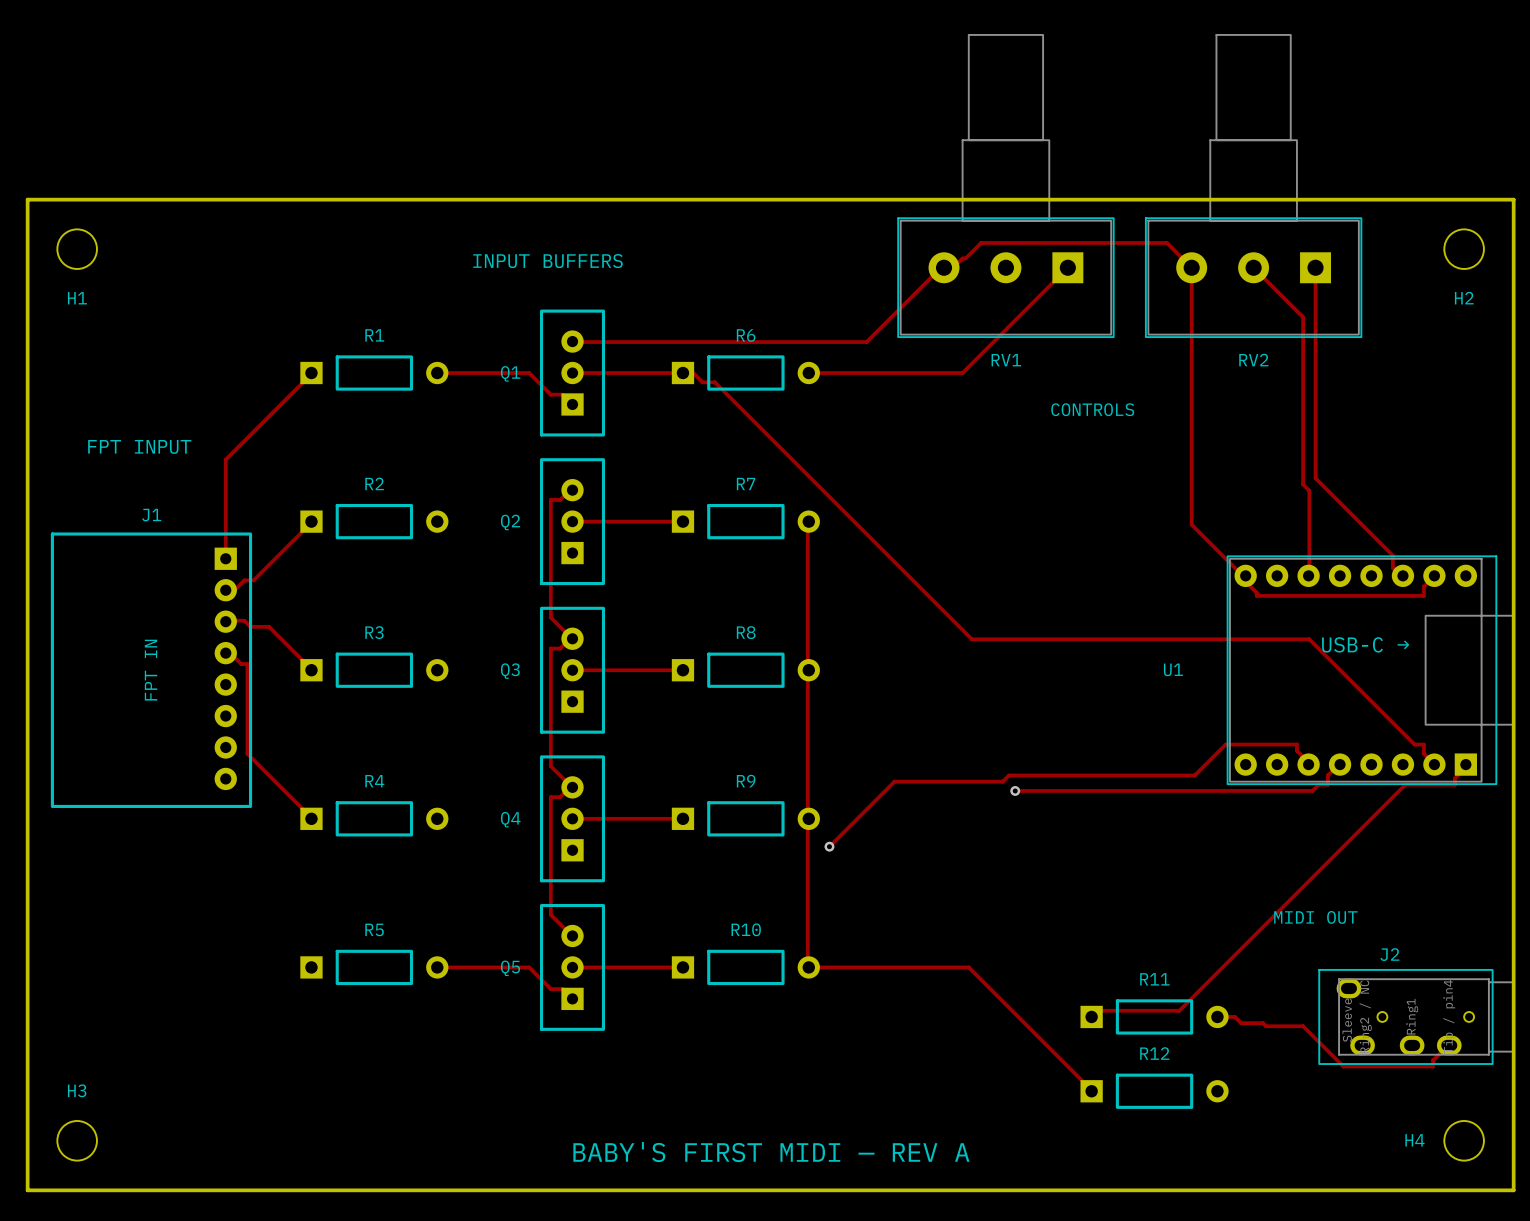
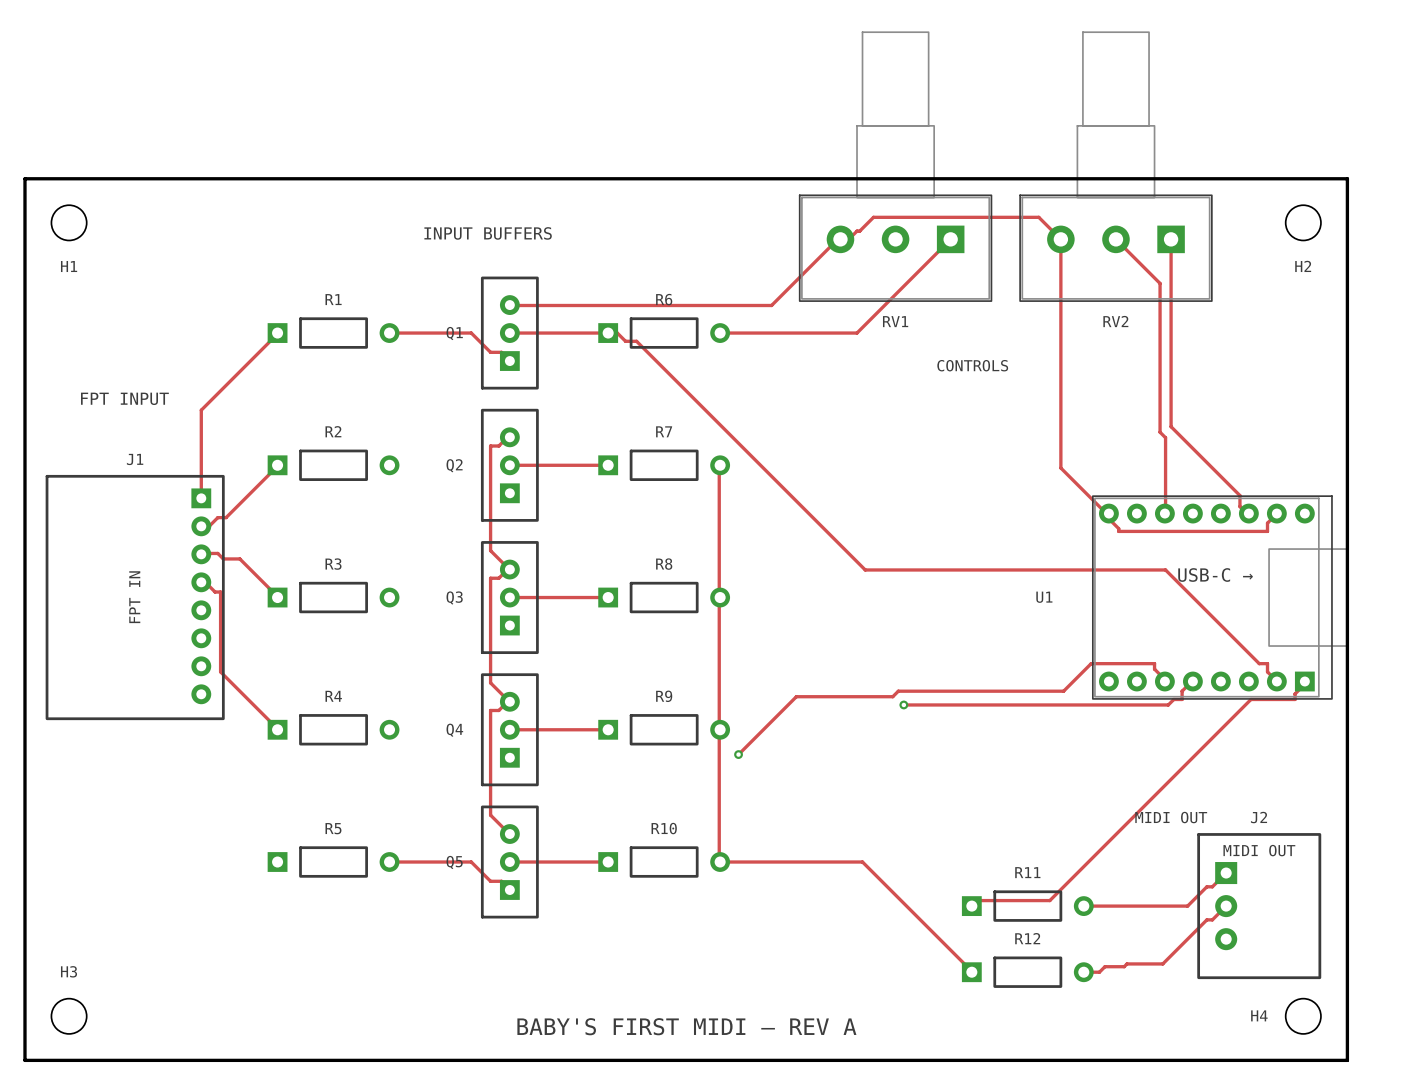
J2 name position: J2 (1389, 954) -> J2 (1259, 817)
J2 footprint: [1318, 968, 1515, 1065] -> [1197, 833, 1322, 980]
track: (1235, 1016) (1241, 1023) (1262, 1023) (1265, 1026) (1303, 1026) (1343, 1066) (1433, 1066) (1433, 1060) (1449, 1045) -> (1099, 906) (1187, 906) (1206, 886) (1212, 886) (1226, 873)
track: none -> (1226, 906) (1212, 919) (1206, 919) (1162, 963) (1127, 963) (1124, 966) (1104, 966) (1099, 972) (1082, 972)

